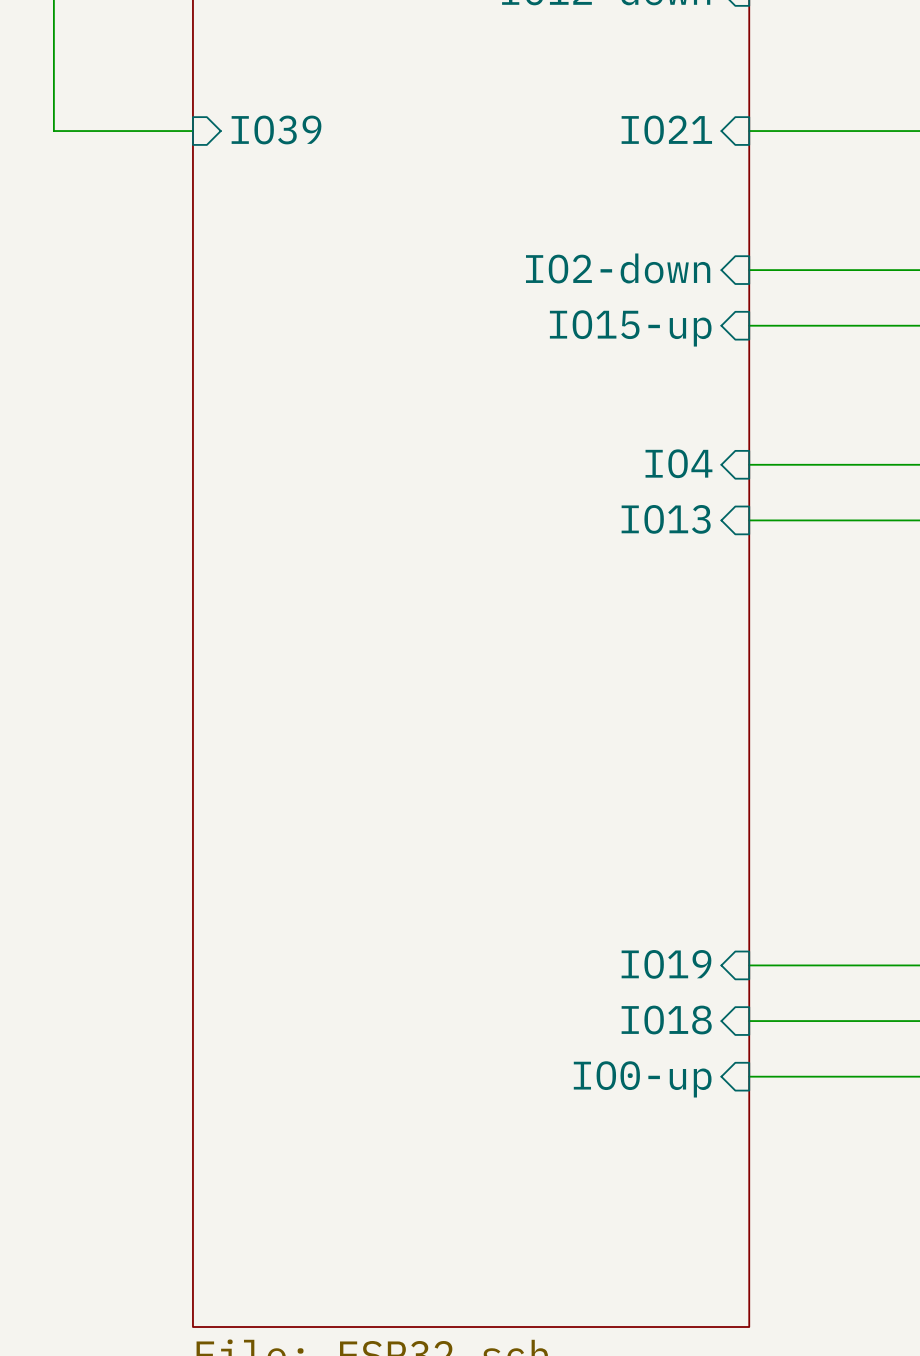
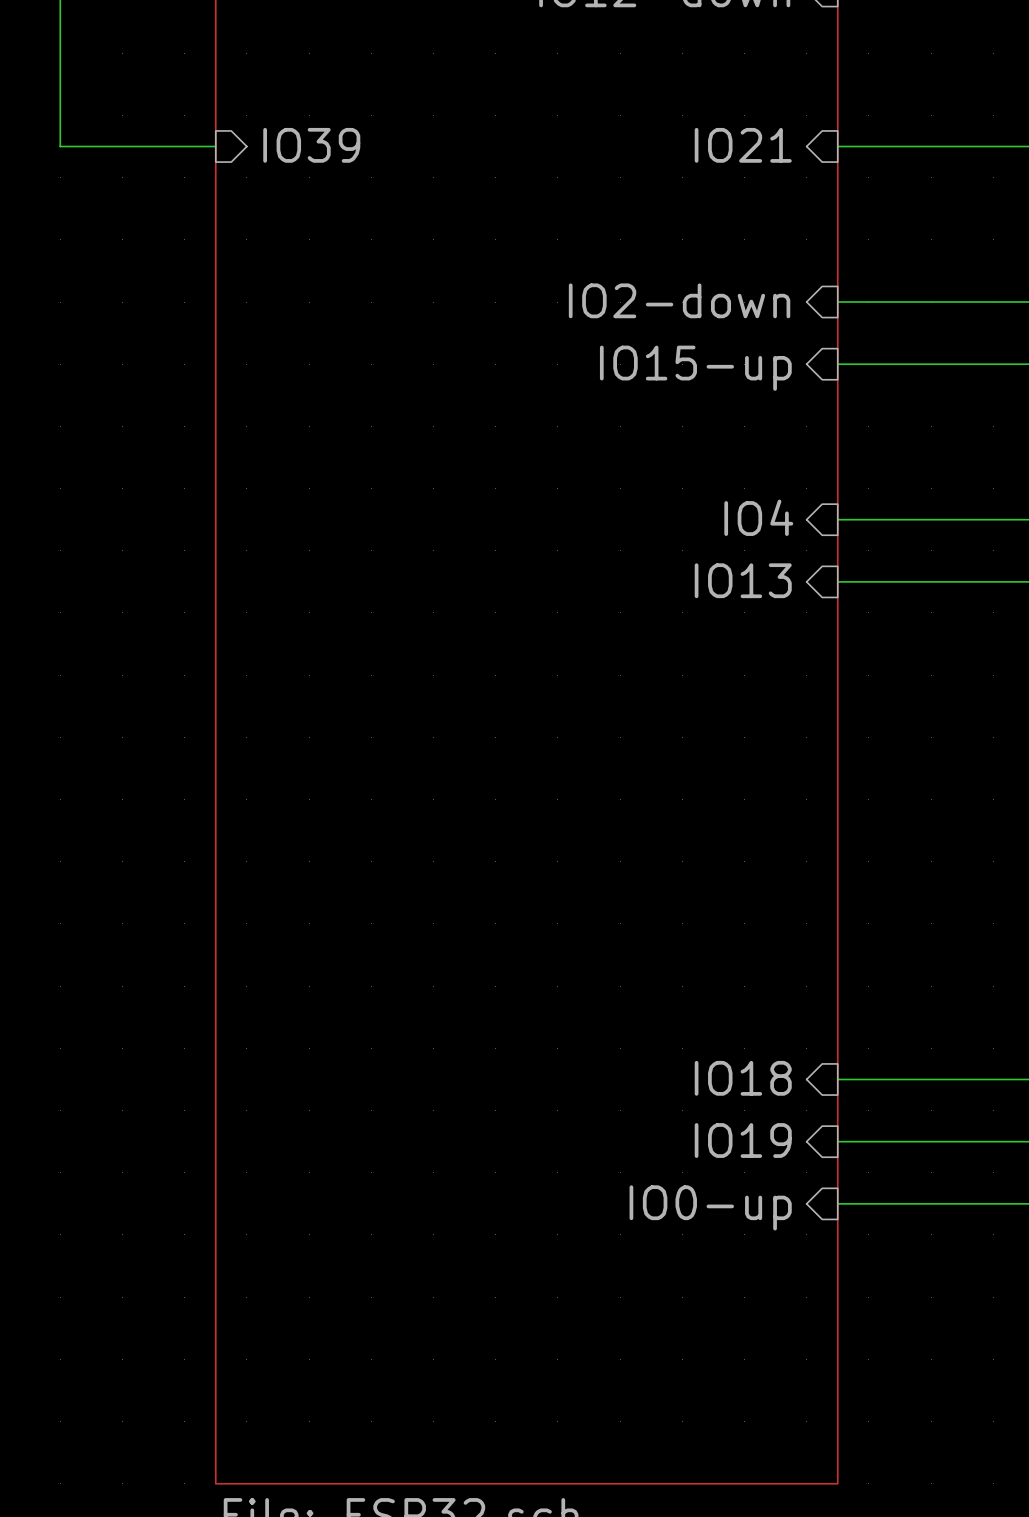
sheet pin: IO19 (666, 964) -> IO18 (743, 1078)
sheet pin: IO18 (666, 1020) -> IO19 (743, 1140)

